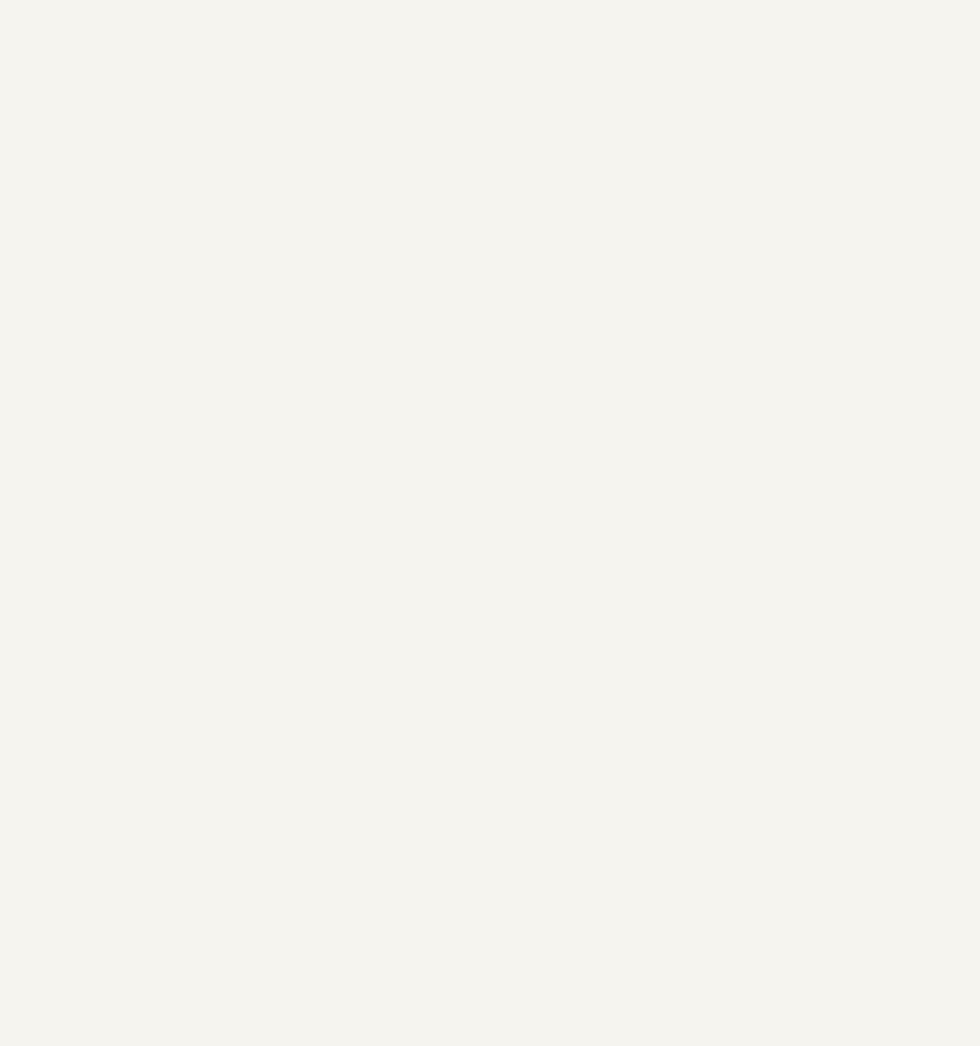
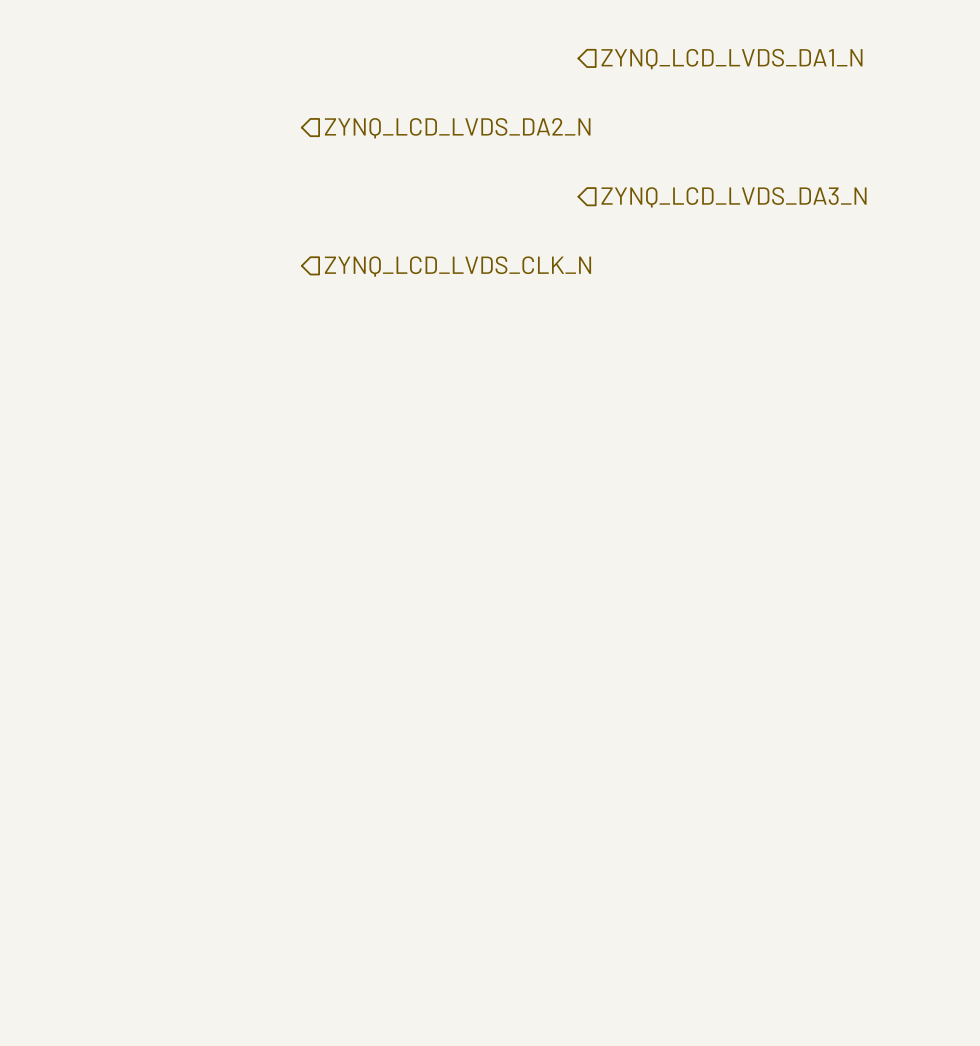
hierarchical label: none -> ZYNQ_LCD_LVDS_DA1_N (731, 59)
hierarchical label: none -> ZYNQ_LCD_LVDS_DA2_N (457, 128)
hierarchical label: none -> ZYNQ_LCD_LVDS_DA3_N (734, 197)
hierarchical label: none -> ZYNQ_LCD_LVDS_CLK_N (457, 266)

